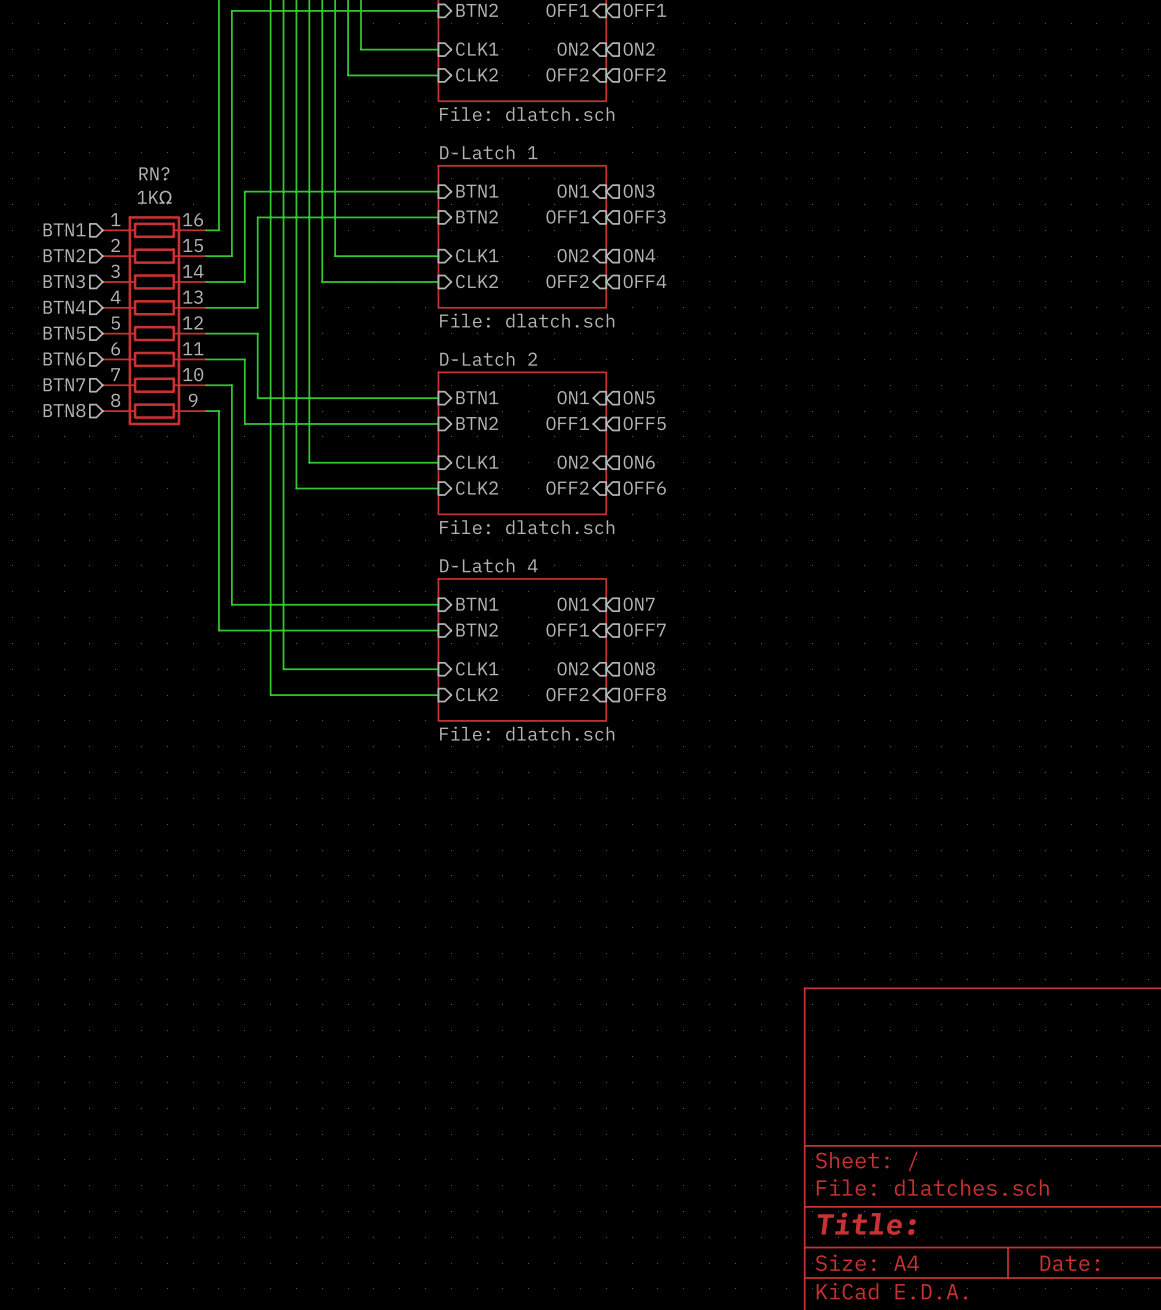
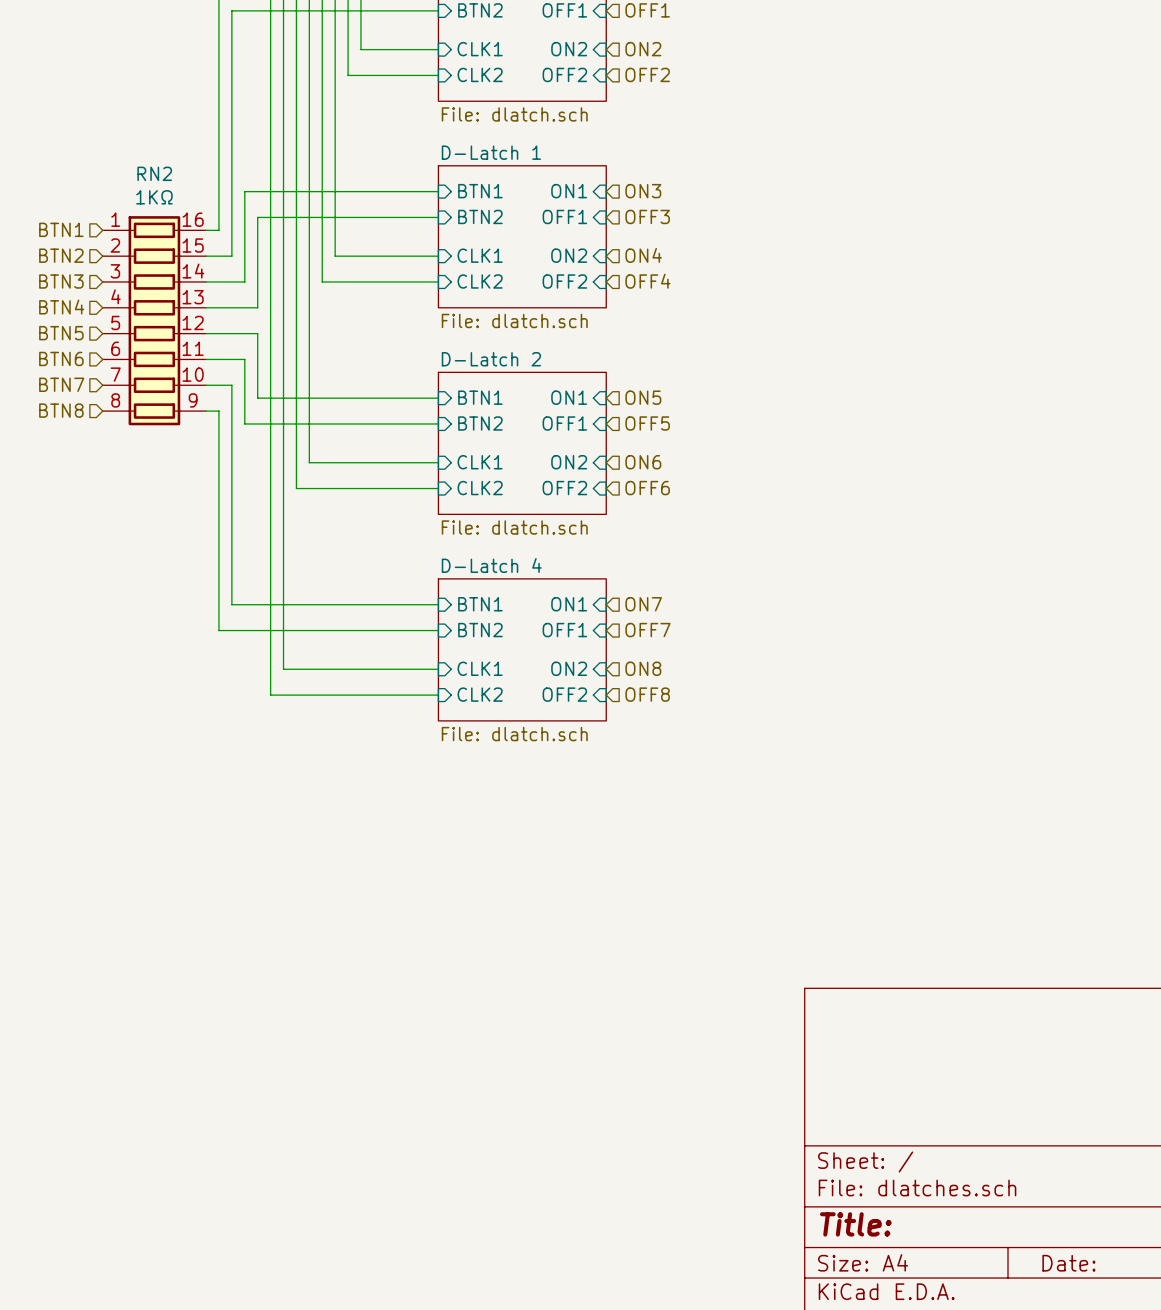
RN? name: RN? (154, 173) -> RN2 (154, 173)

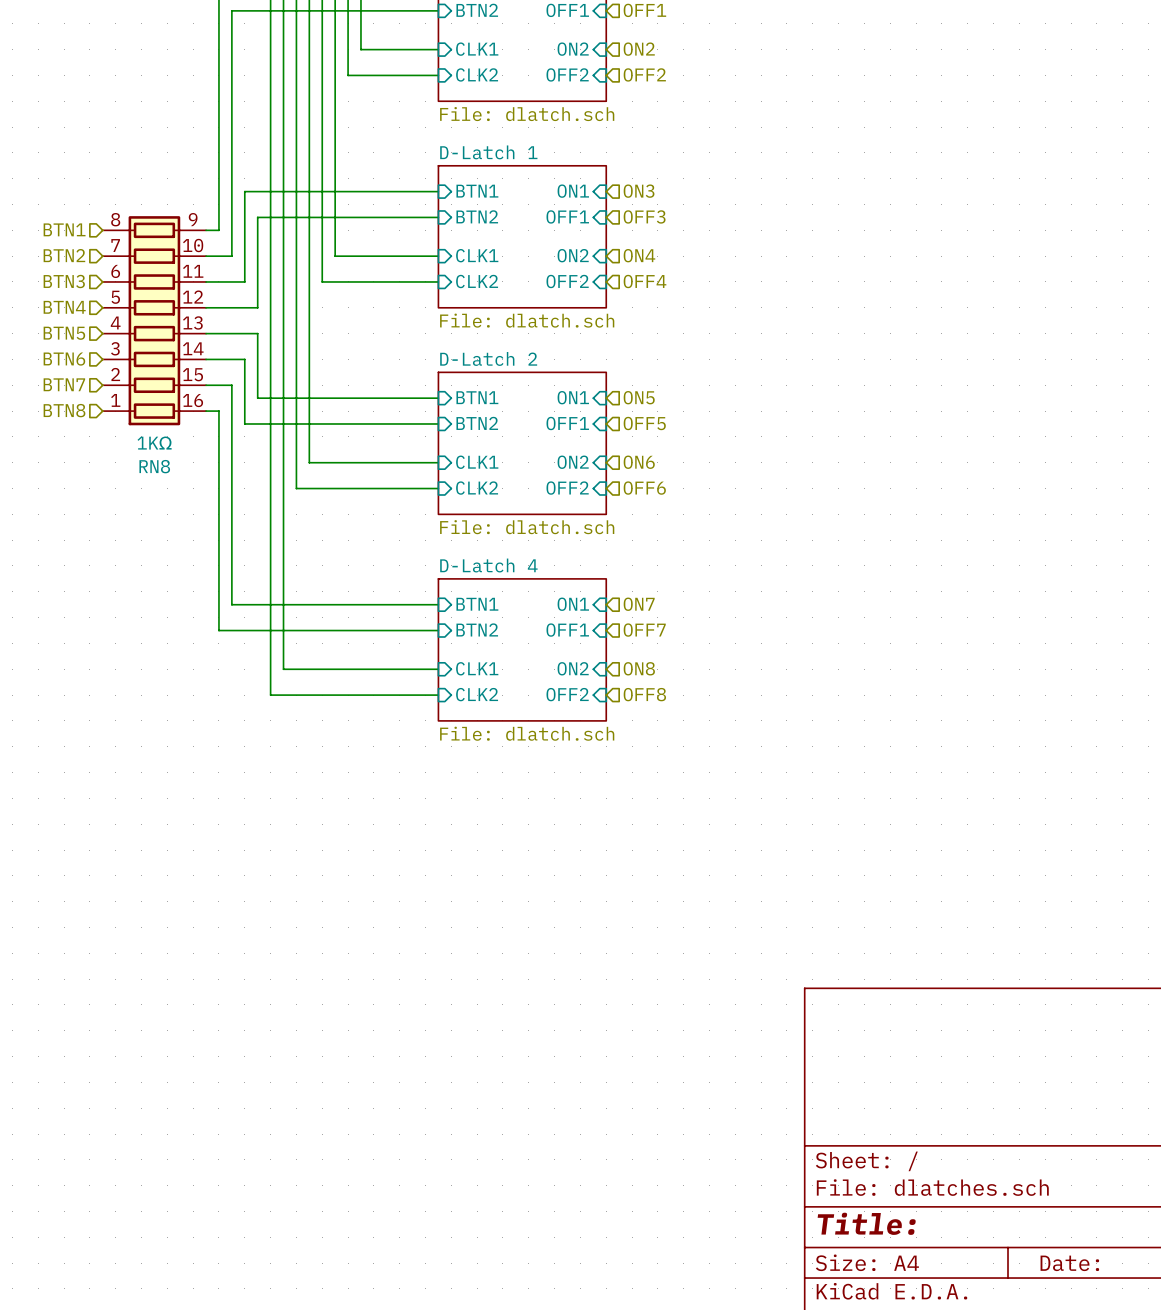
RN2 name: RN2 (154, 173) -> RN8 (154, 466)
RN2 flip: as is (154, 320) -> up-down (154, 320)

